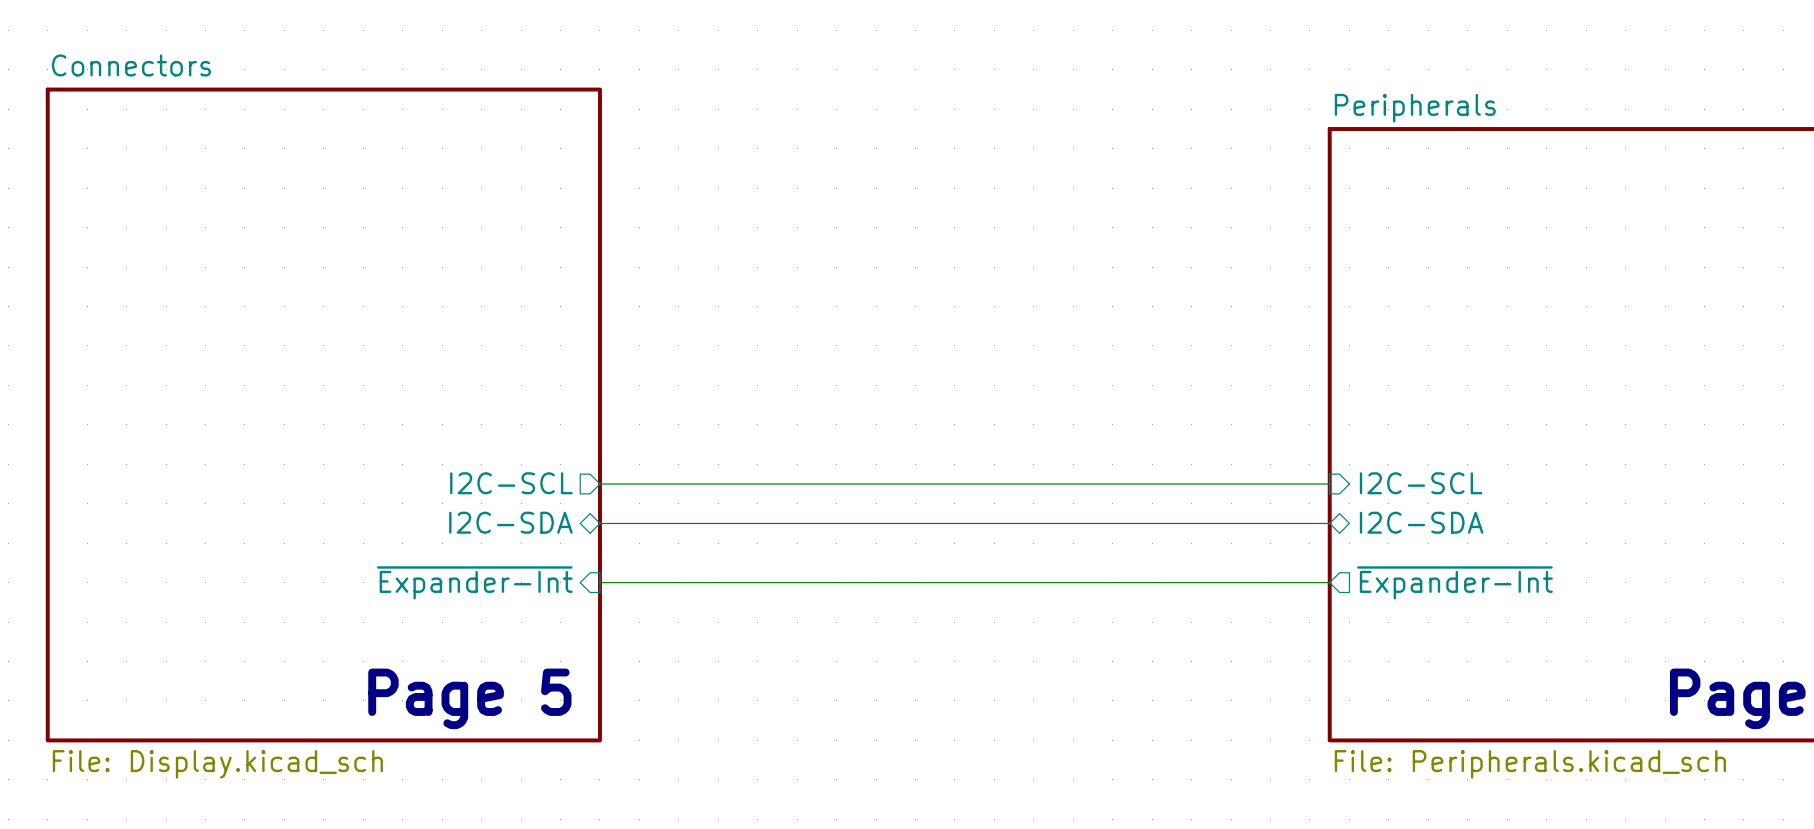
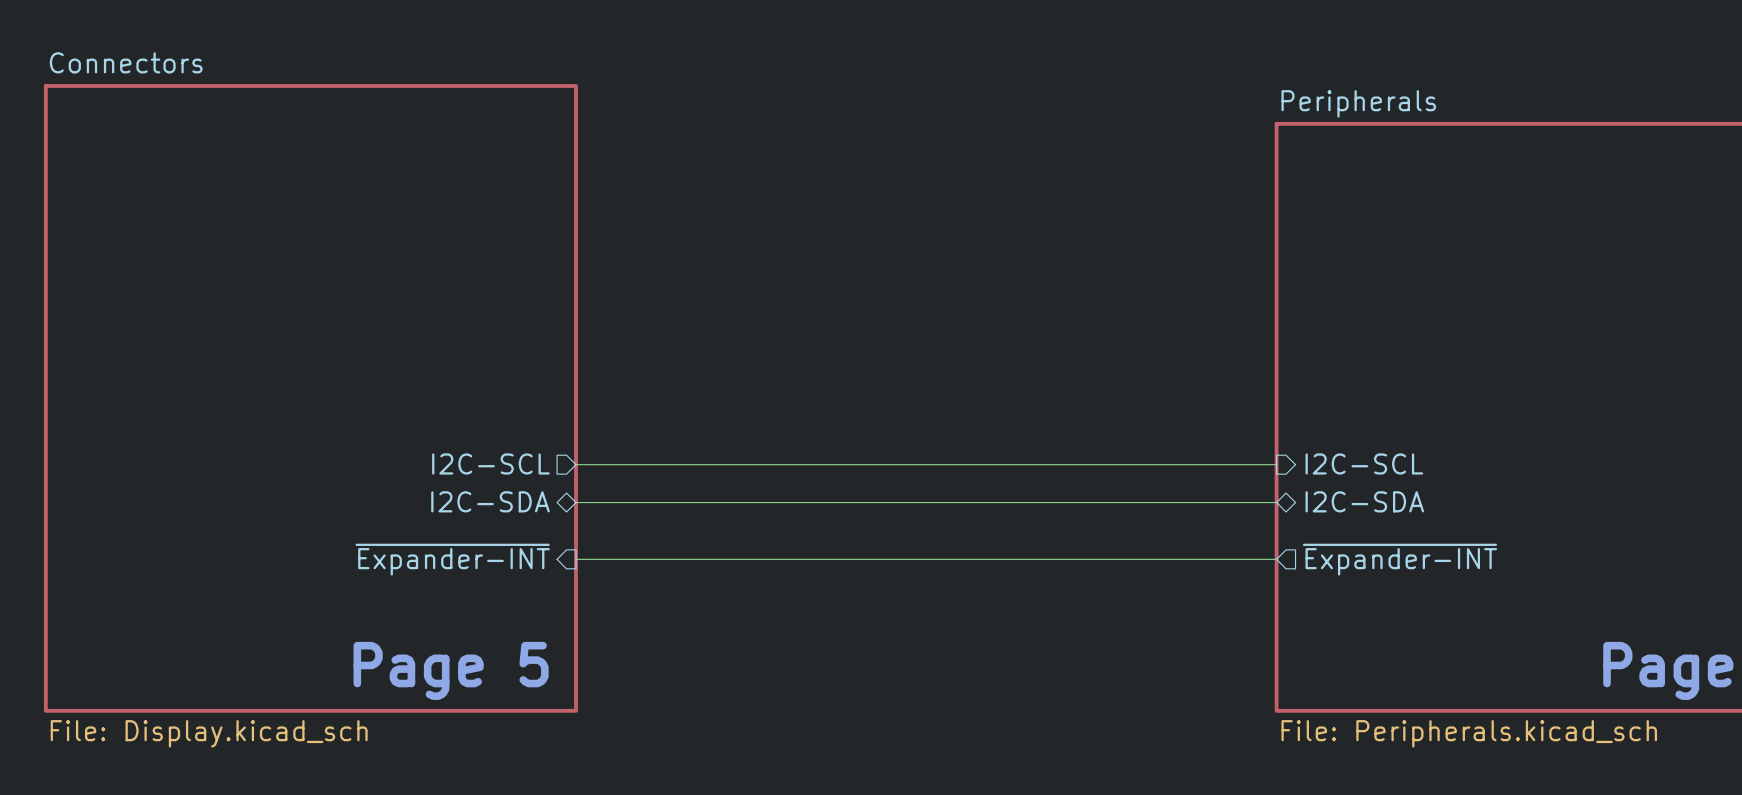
sheet pin: ~{Expander-Int} (474, 582) -> ~{Expander-INT} (452, 559)
sheet pin: ~{Expander-Int} (1454, 582) -> ~{Expander-INT} (1400, 559)

